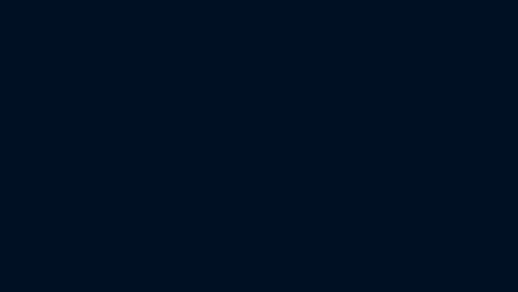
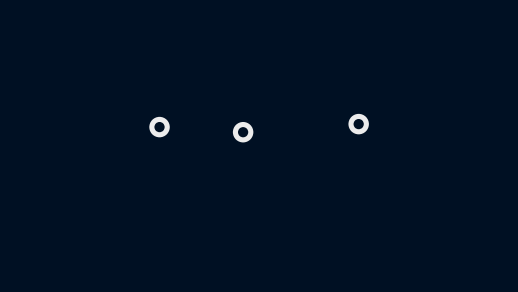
via: none -> (358, 124)
via: none -> (159, 127)
via: none -> (243, 132)

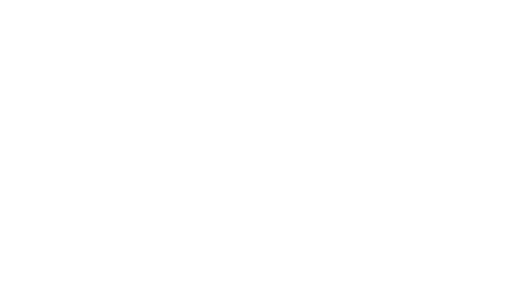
via: (358, 124) -> none
via: (159, 127) -> none
via: (243, 132) -> none

